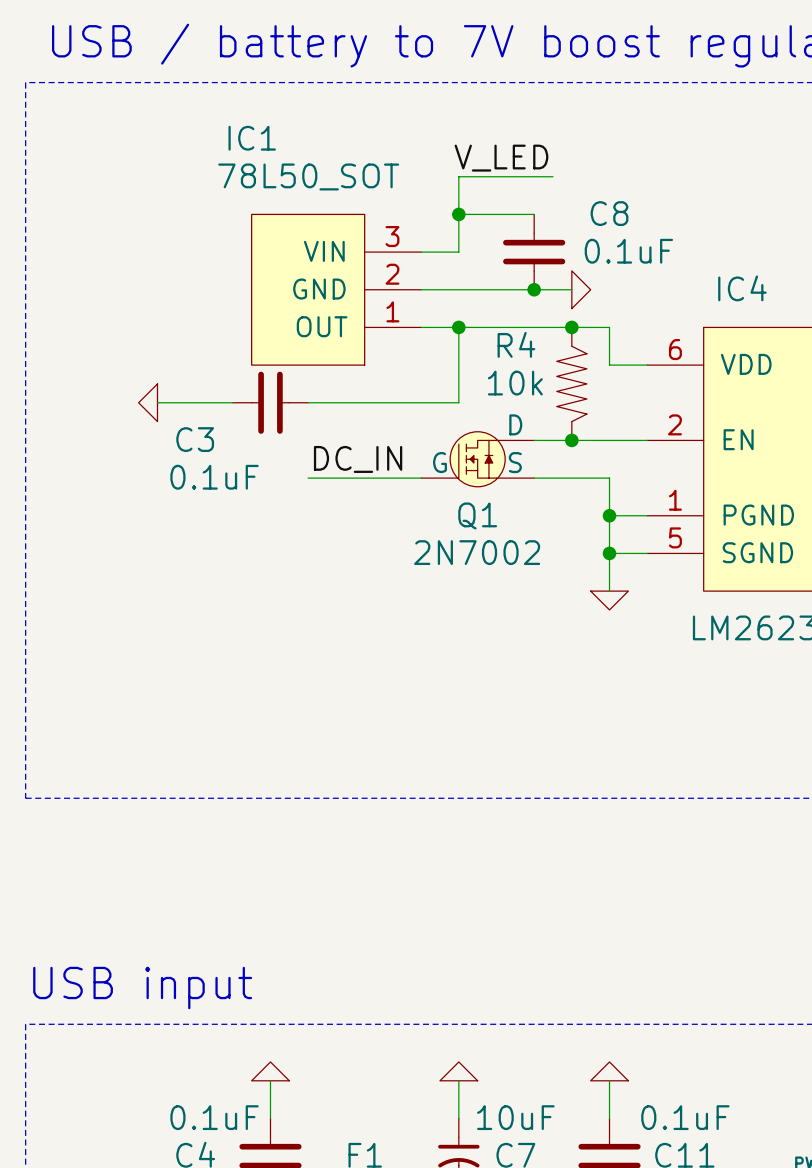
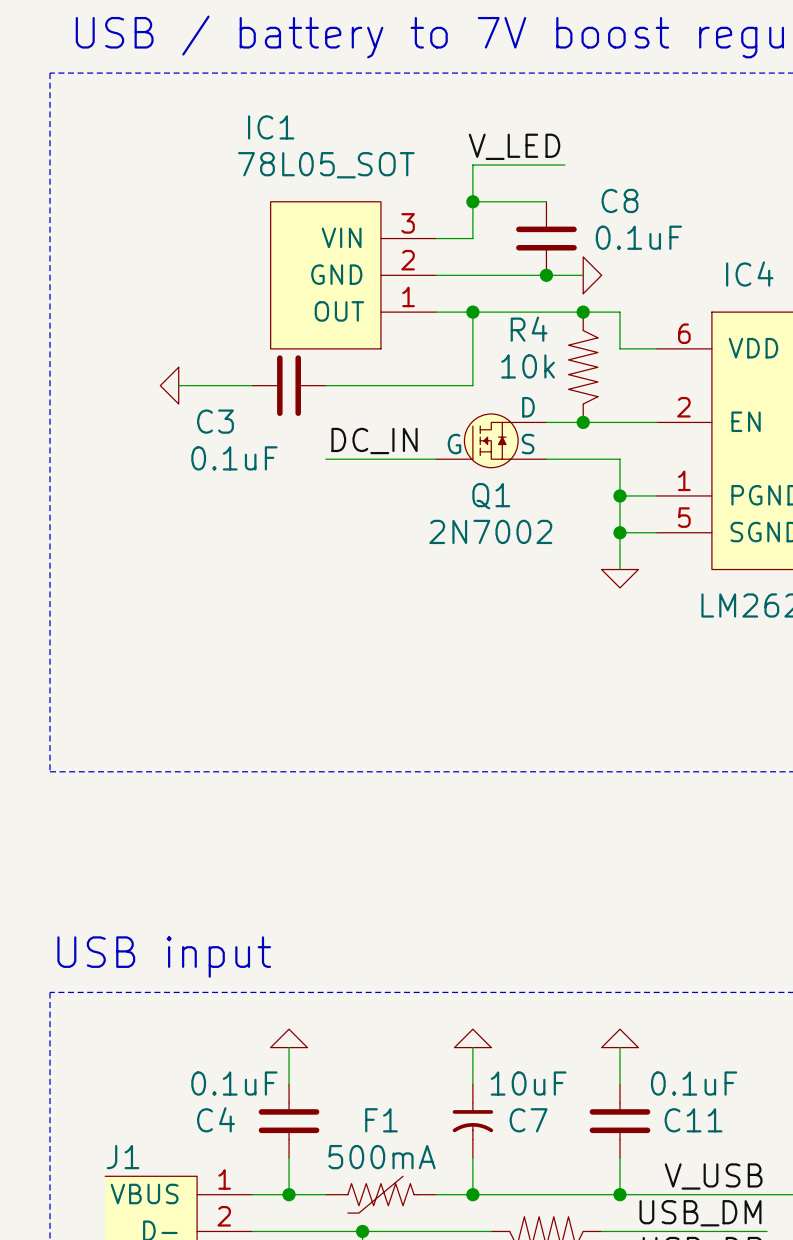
IC1 value: 78L50_SOT (308, 176) -> 78L05_SOT (326, 165)

